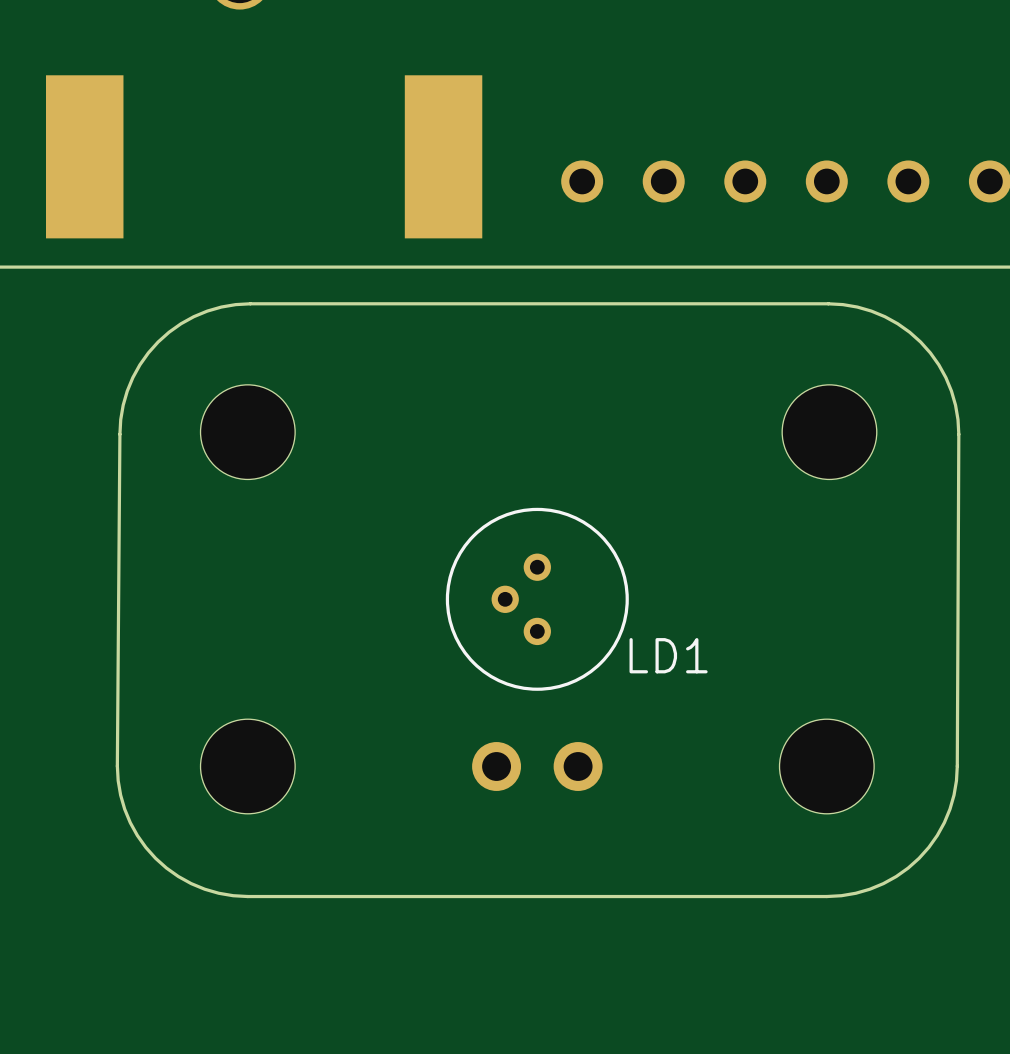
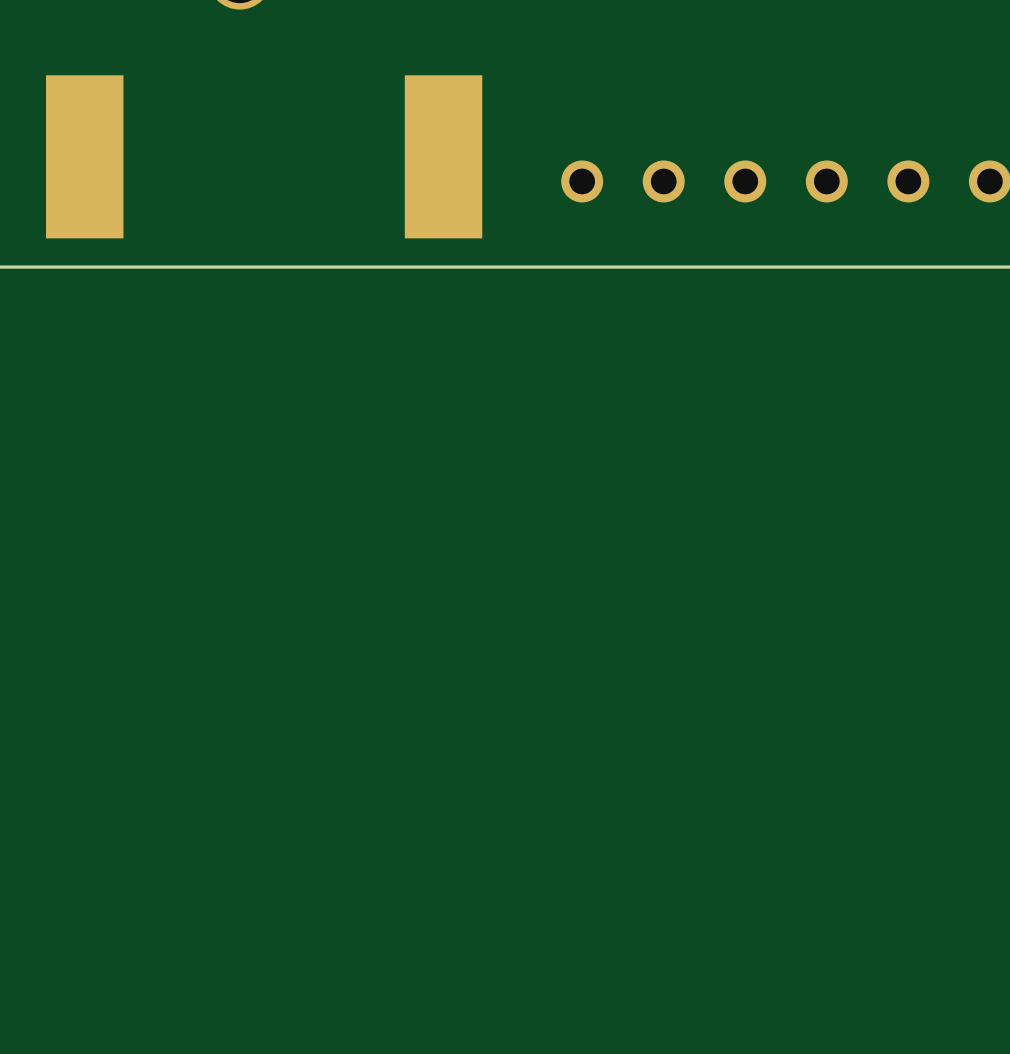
board edge: (828, 303) (250, 303) (235, 304) (207, 311) (180, 323) (169, 332) (148, 352) (132, 377) (123, 405) (119, 434) (118, 780) (120, 795) (130, 822) (145, 847) (166, 868) (191, 883) (218, 893) (247, 896) (826, 896) (841, 895) (869, 889) (883, 883) (908, 868) (928, 847) (944, 822) (954, 795) (956, 780) (958, 419) (951, 391) (938, 364) (930, 352) (909, 332) (897, 323) (871, 311) (842, 304) (828, 303) -> none
part: (247, 432) -> none
part: (829, 432) -> none
LD1: (537, 599) -> none
part: (247, 766) -> none
part: (537, 766) -> none
part: (826, 766) -> none

